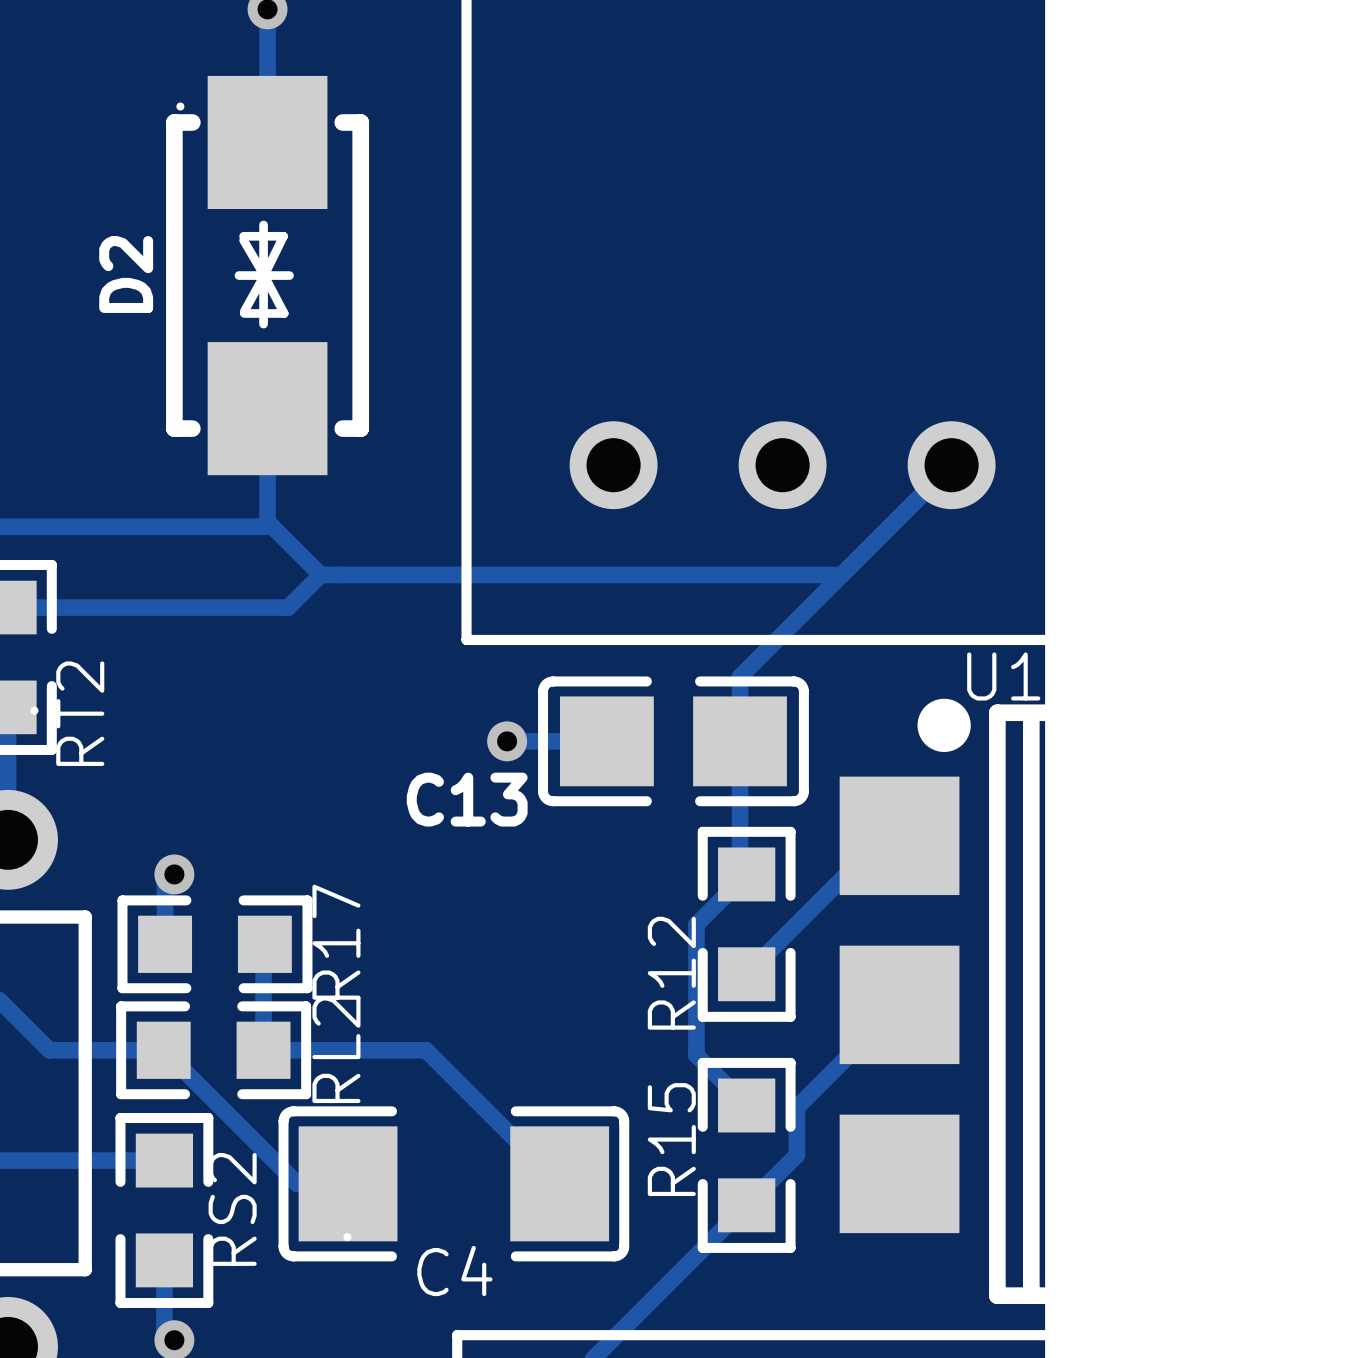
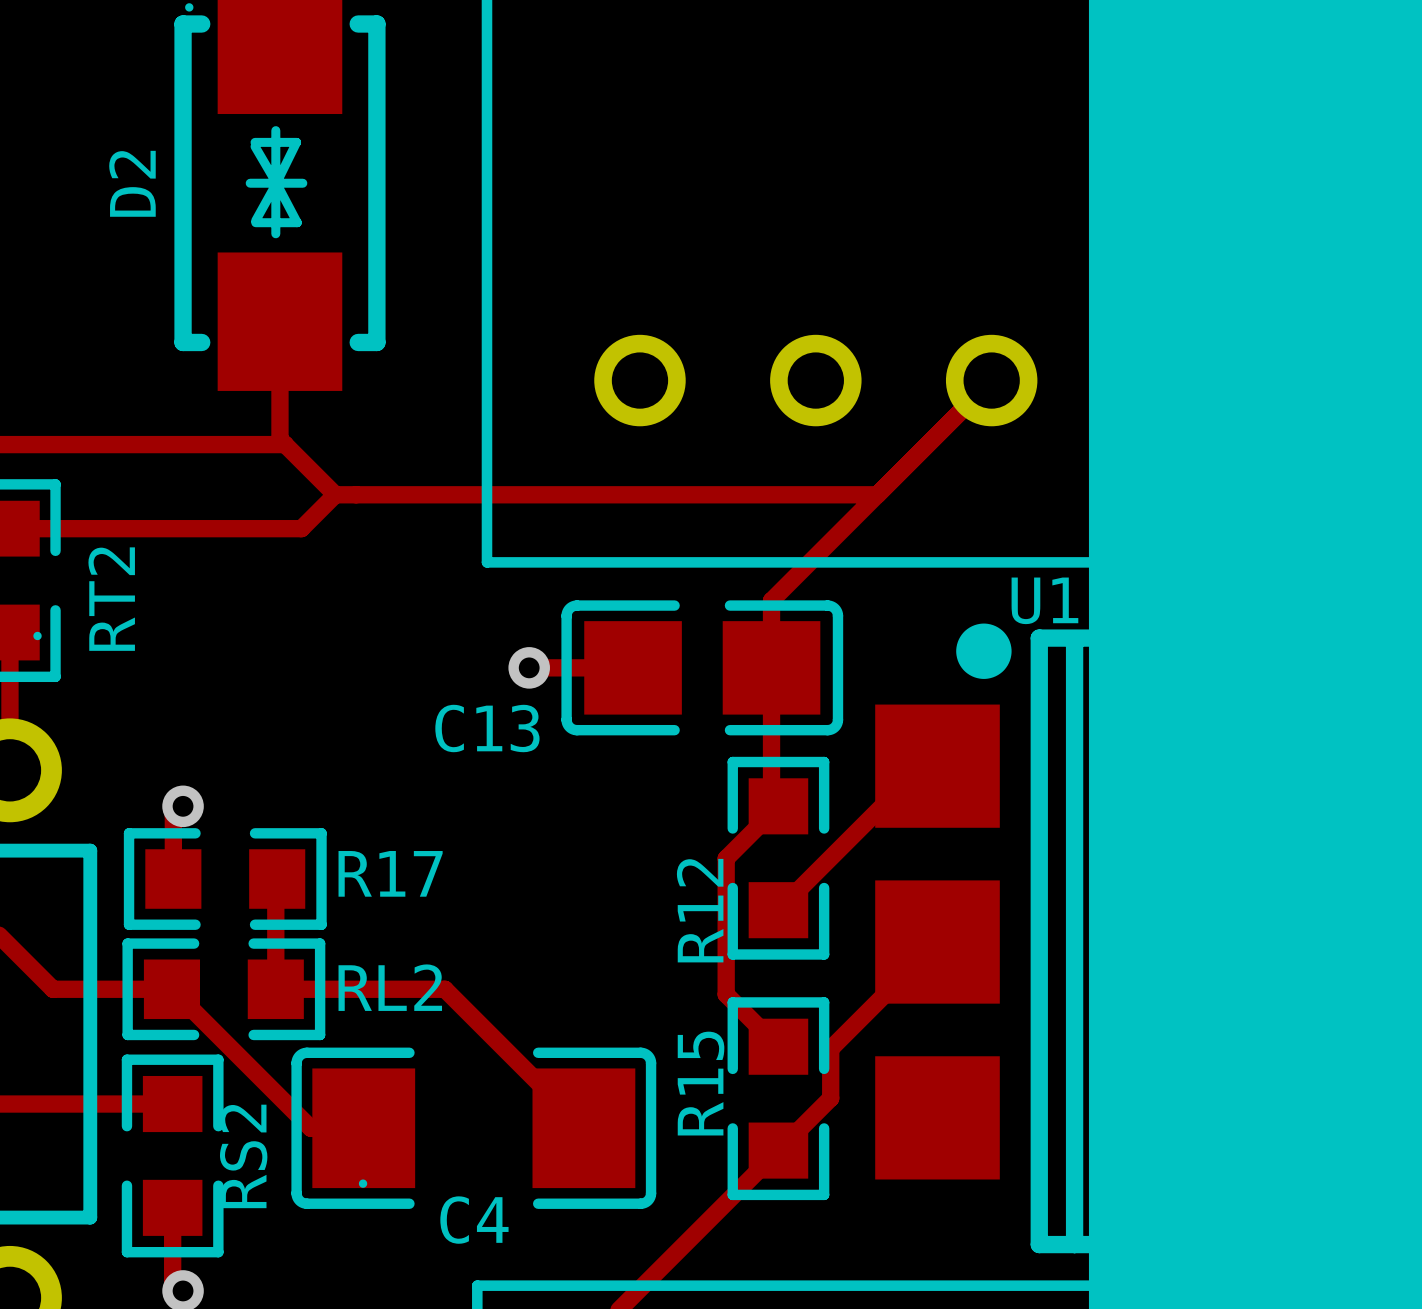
RT2 name position: RT2 (80, 713) -> RT2 (111, 599)
R17 name rotation: 0° (336, 942) -> 90° clockwise (390, 873)
RL2 name rotation: 0° (336, 1049) -> 90° clockwise (390, 987)

